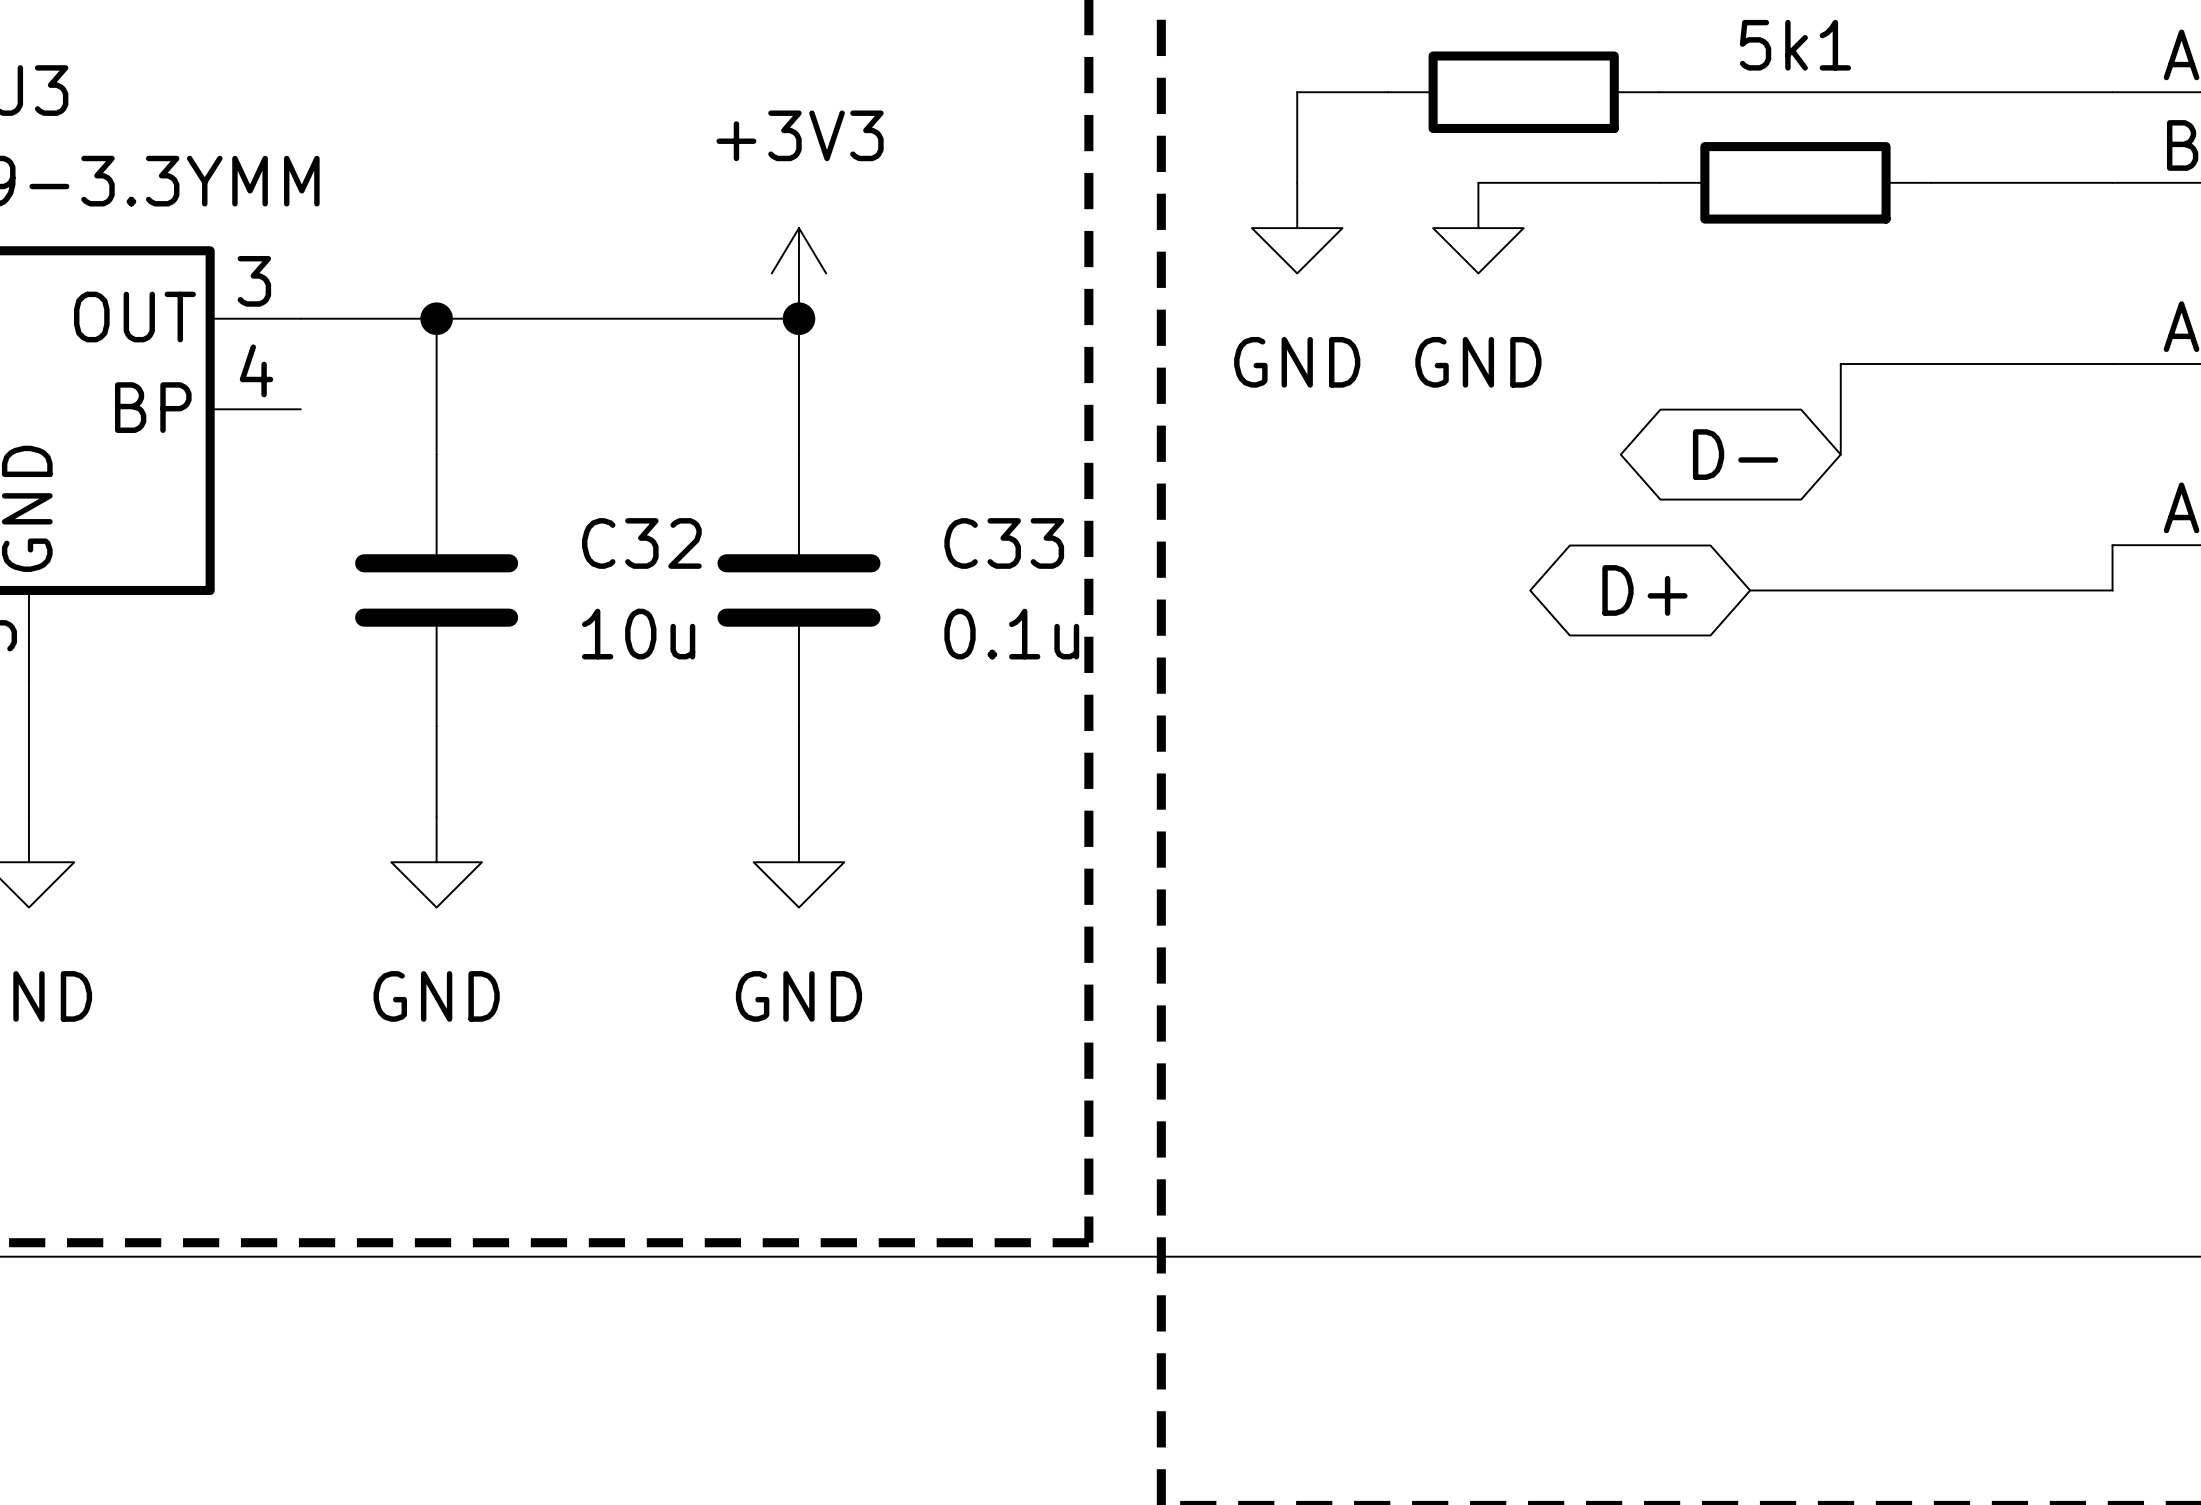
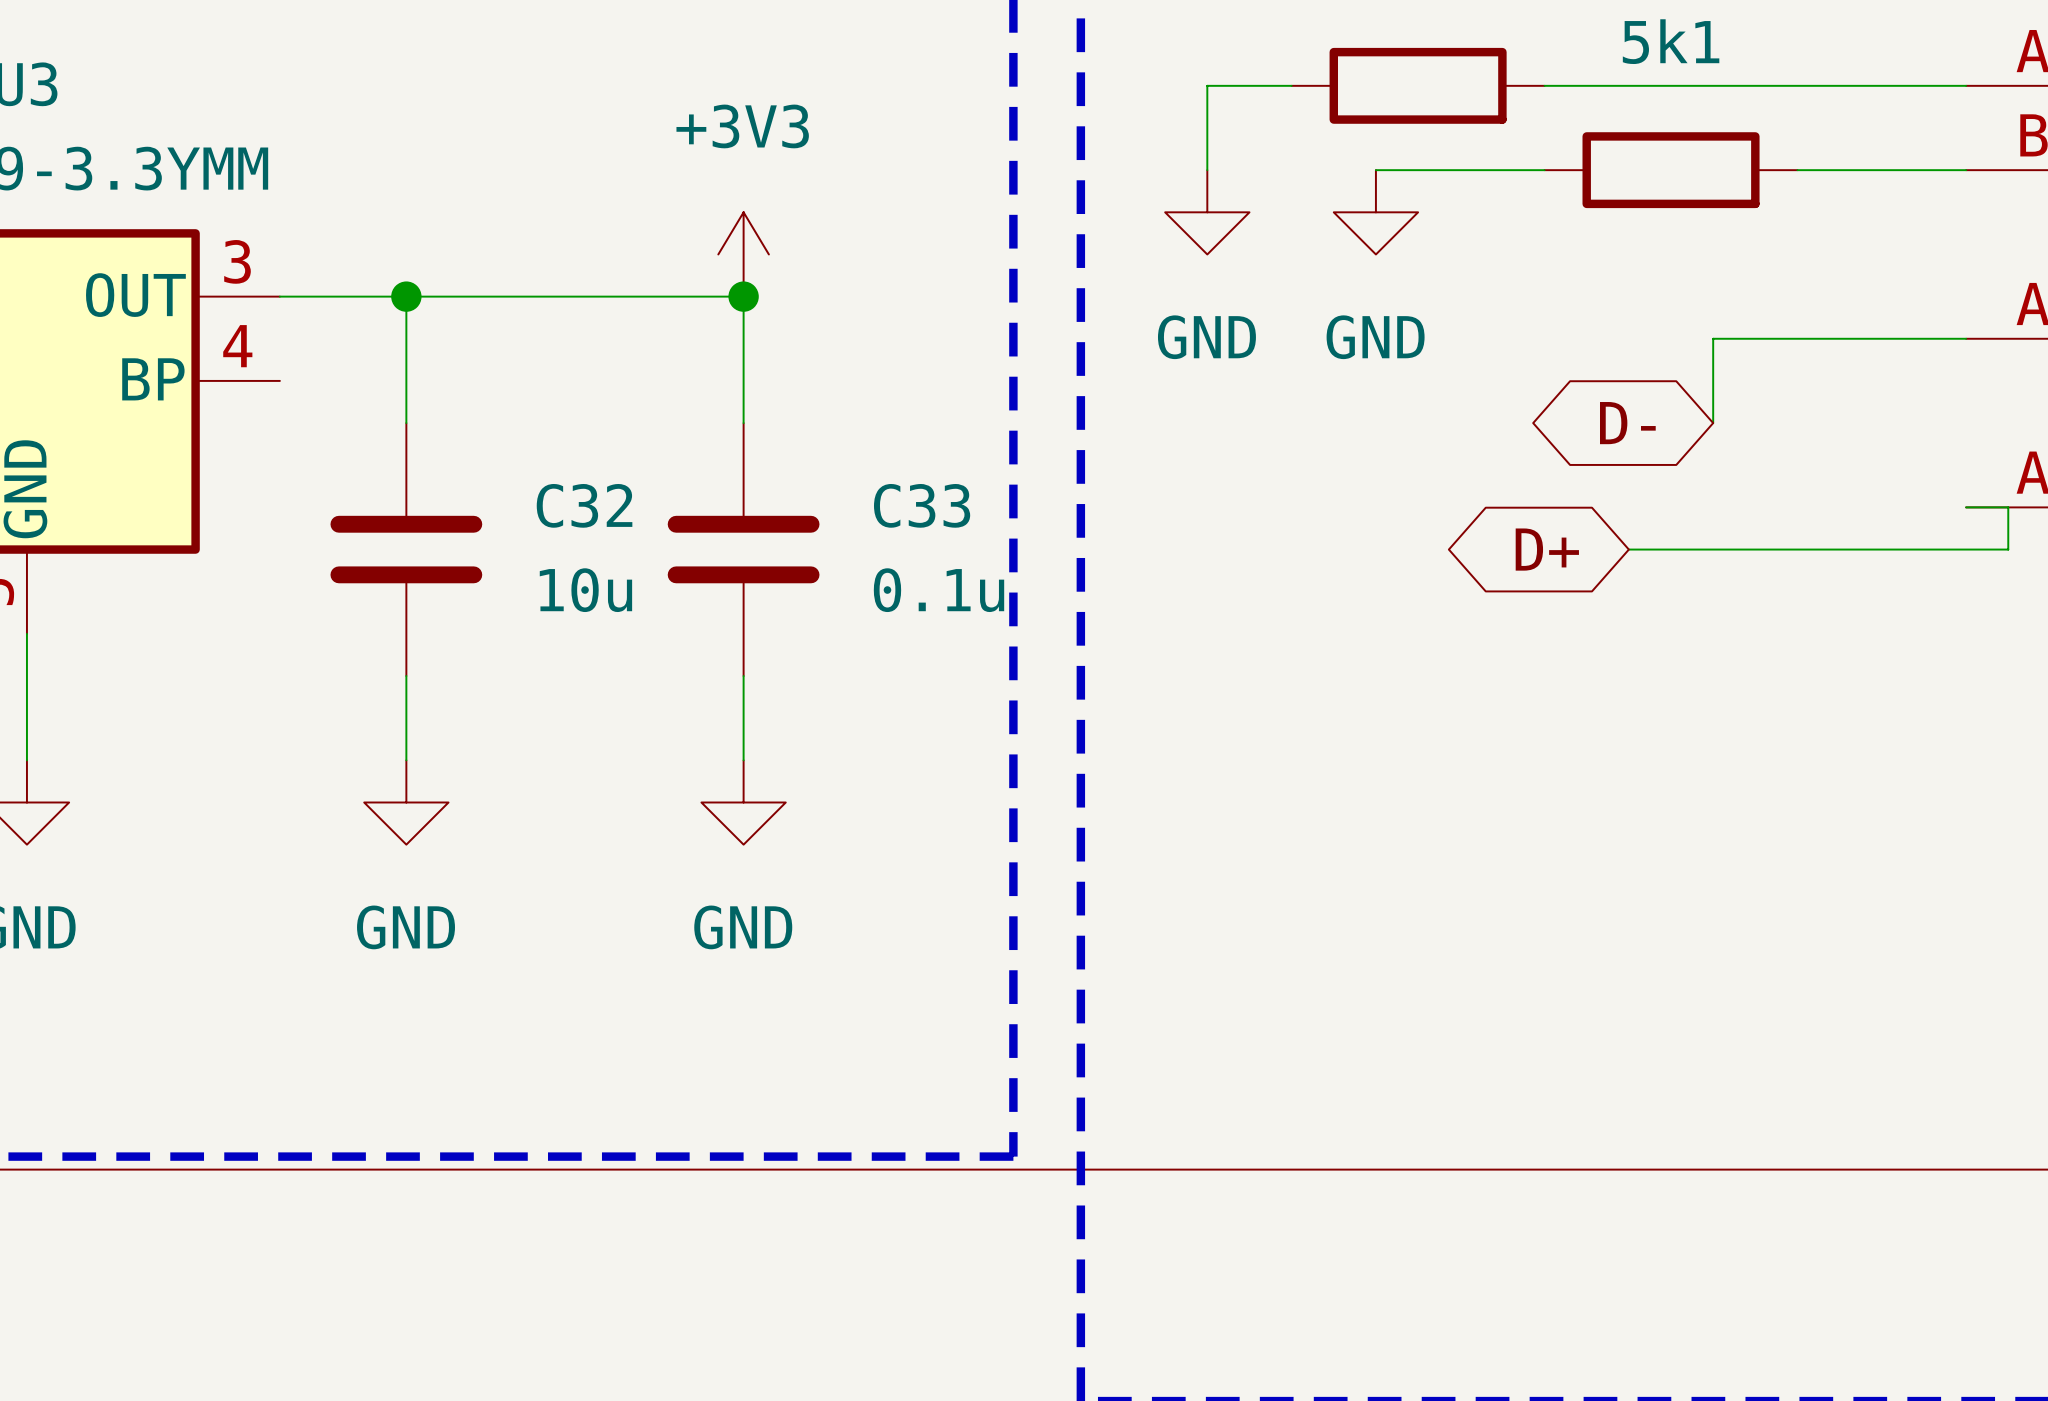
wire: (2112, 545) (2112, 590) -> (1966, 507) (2008, 507) (2008, 549) (1966, 549)

